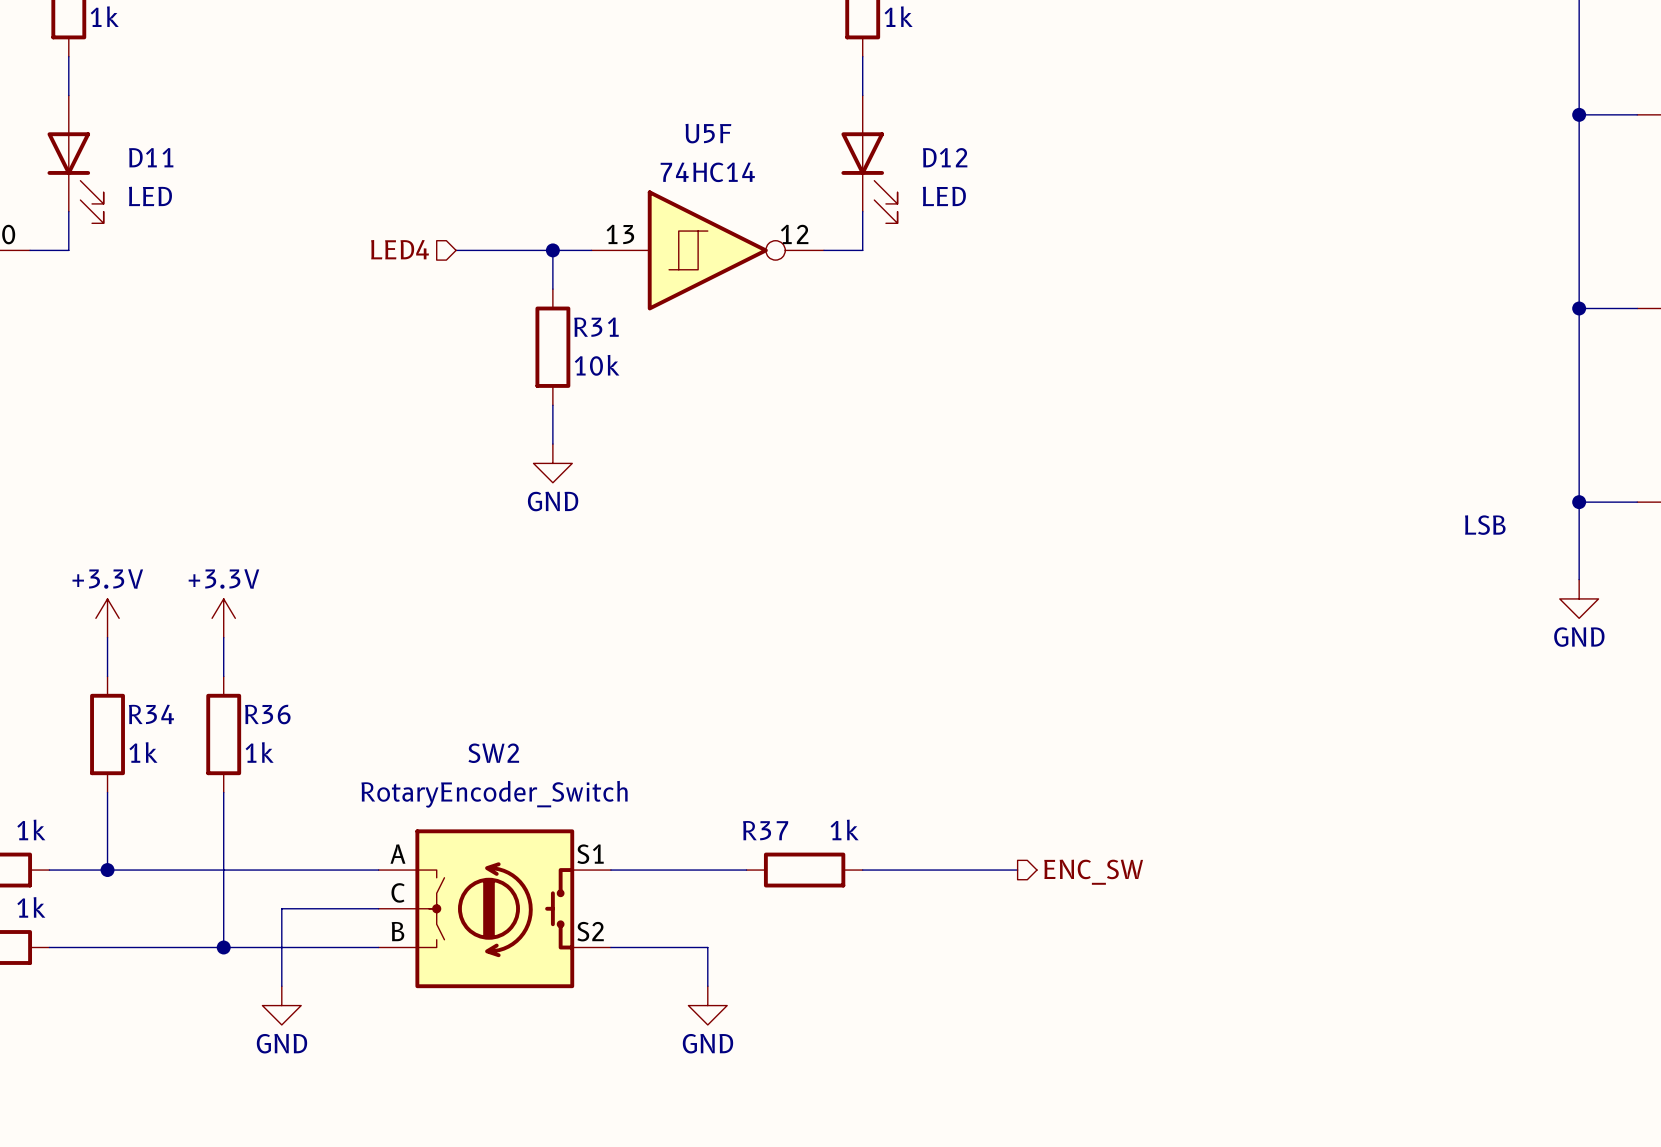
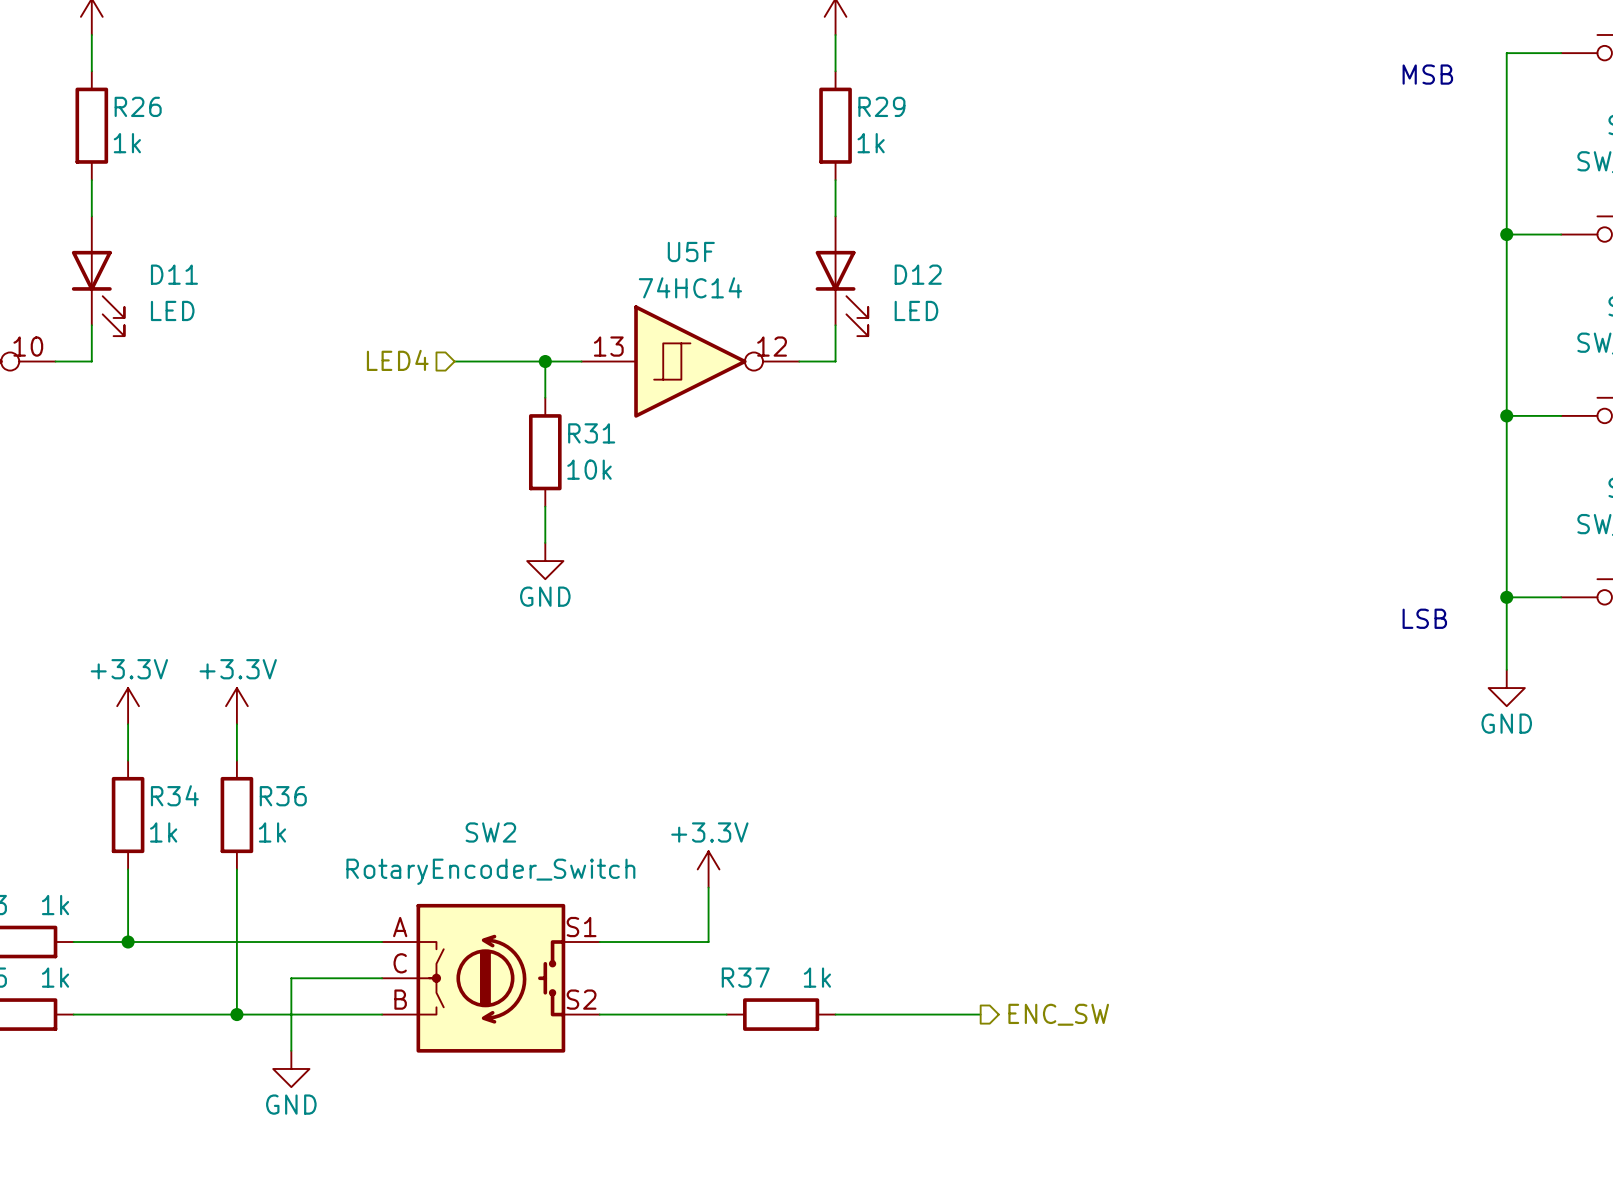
power symbol: none -> +3.3V (708, 869)
wire: (727, 870) (746, 870) -> (708, 942) (708, 887)
R37 position: (804, 870) -> (781, 1014)
wire: (862, 870) (1017, 870) -> (835, 1014) (980, 1014)
hierarchical label position: ENC_SW (1093, 872) -> ENC_SW (1058, 1014)
wire: (707, 947) (707, 986) -> (690, 1014) (726, 1014)
power symbol: GND (707, 1005) -> none

